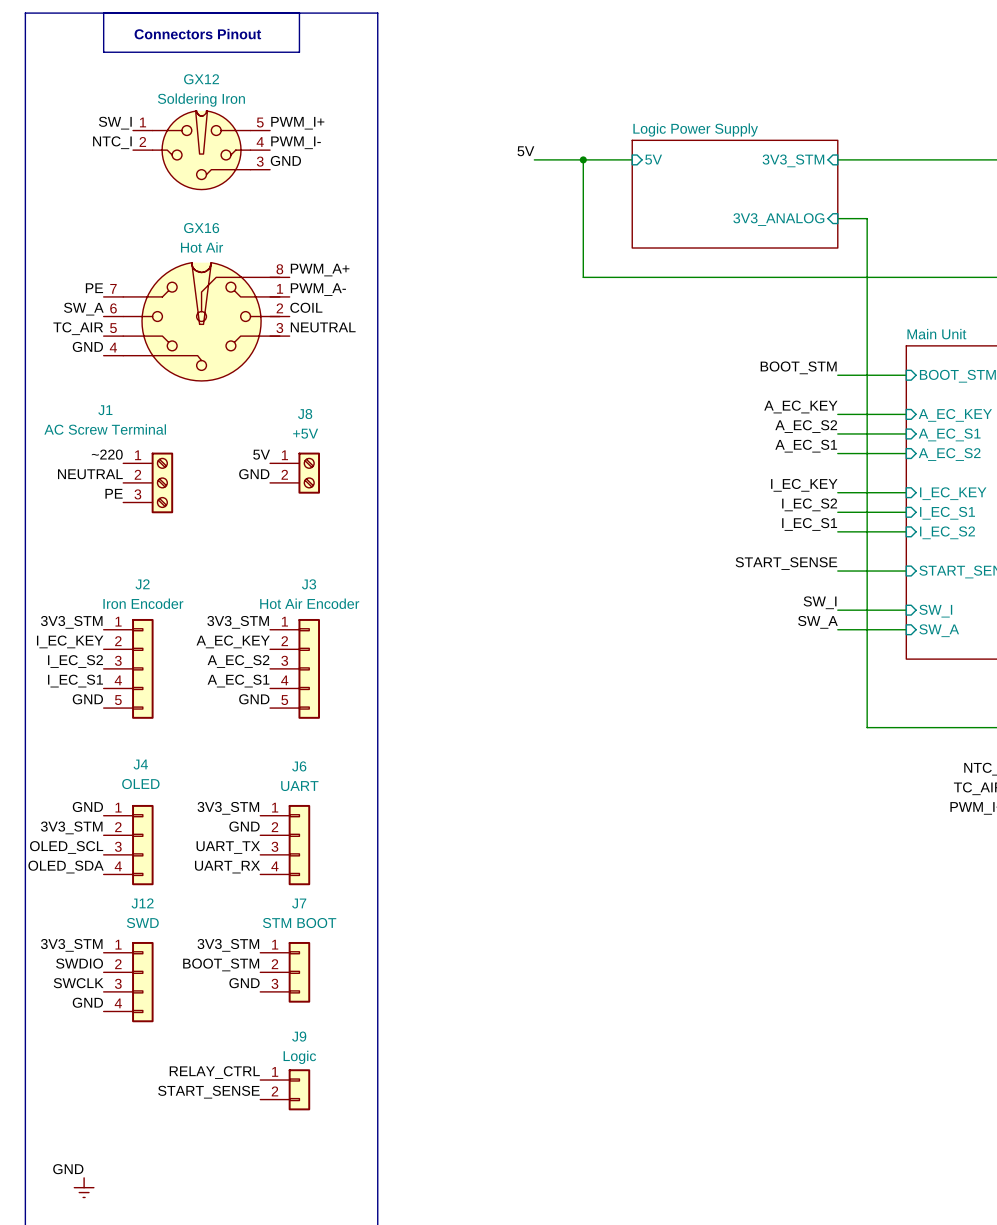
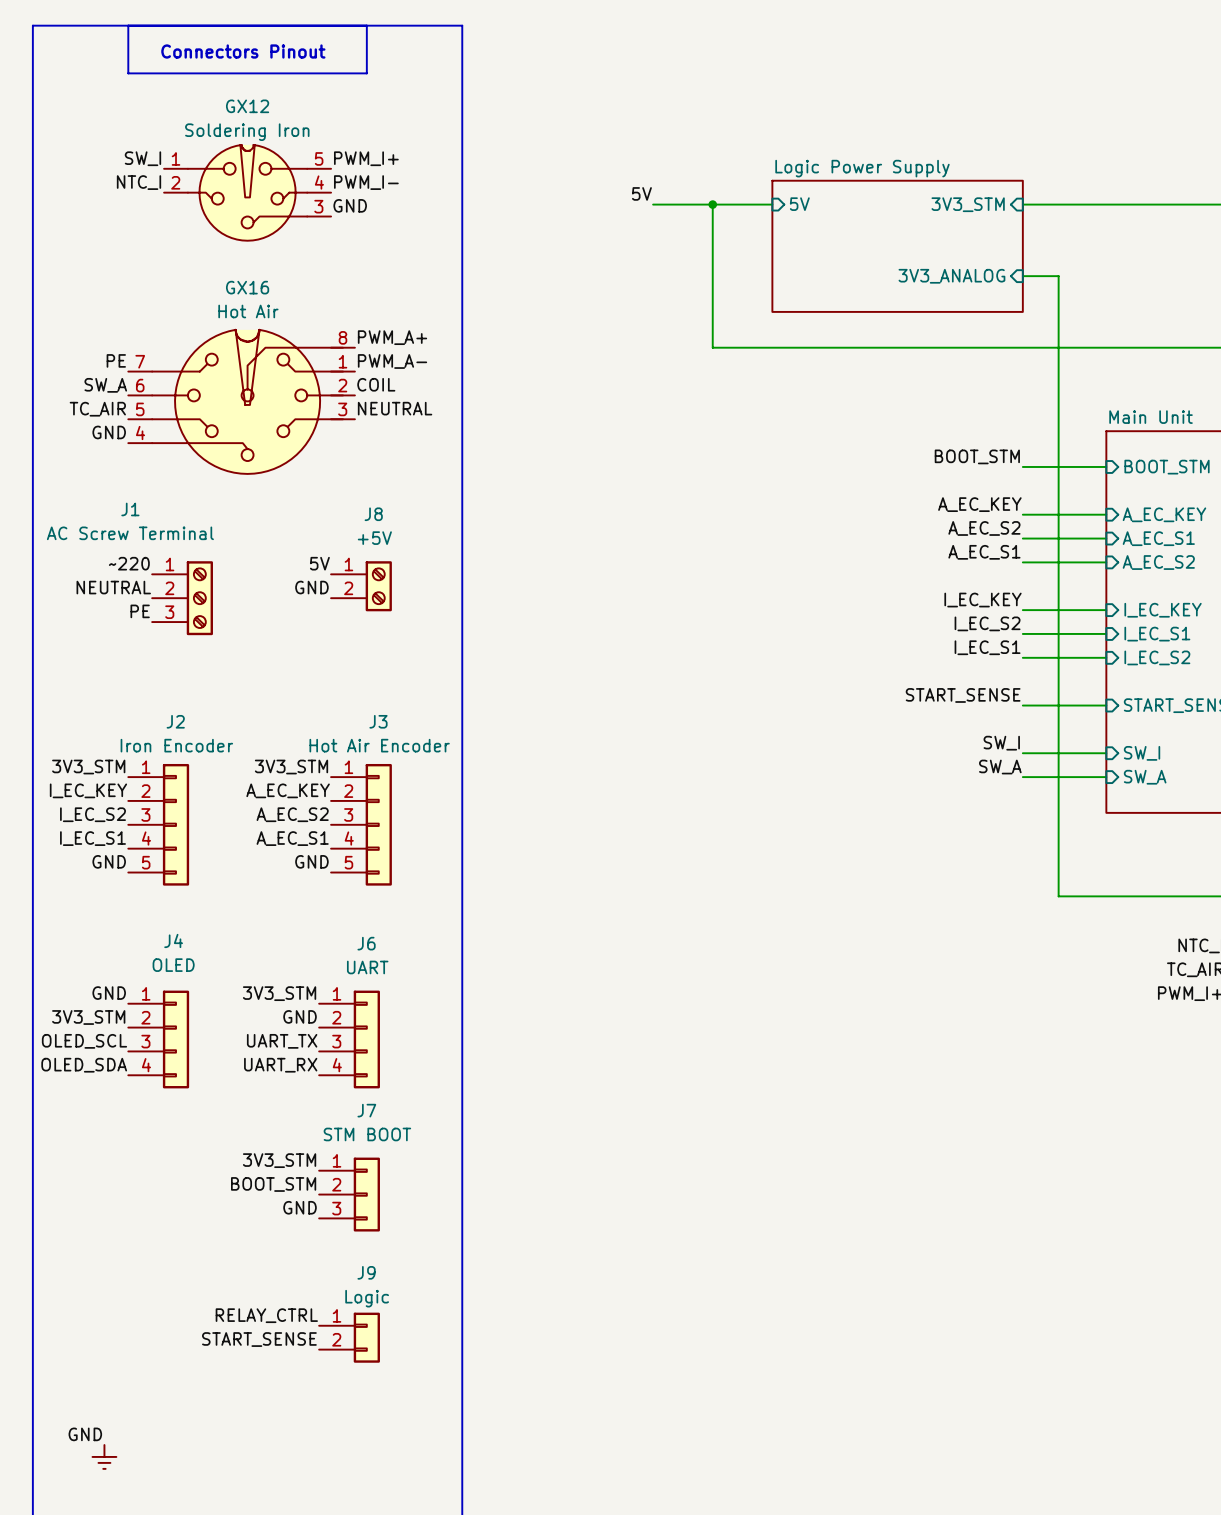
label: 3V3_STM (71, 945) -> none
label: SWDIO (79, 963) -> none
J12: SWD (128, 982) -> none
label: SWCLK (78, 983) -> none
label: GND (87, 1002) -> none

